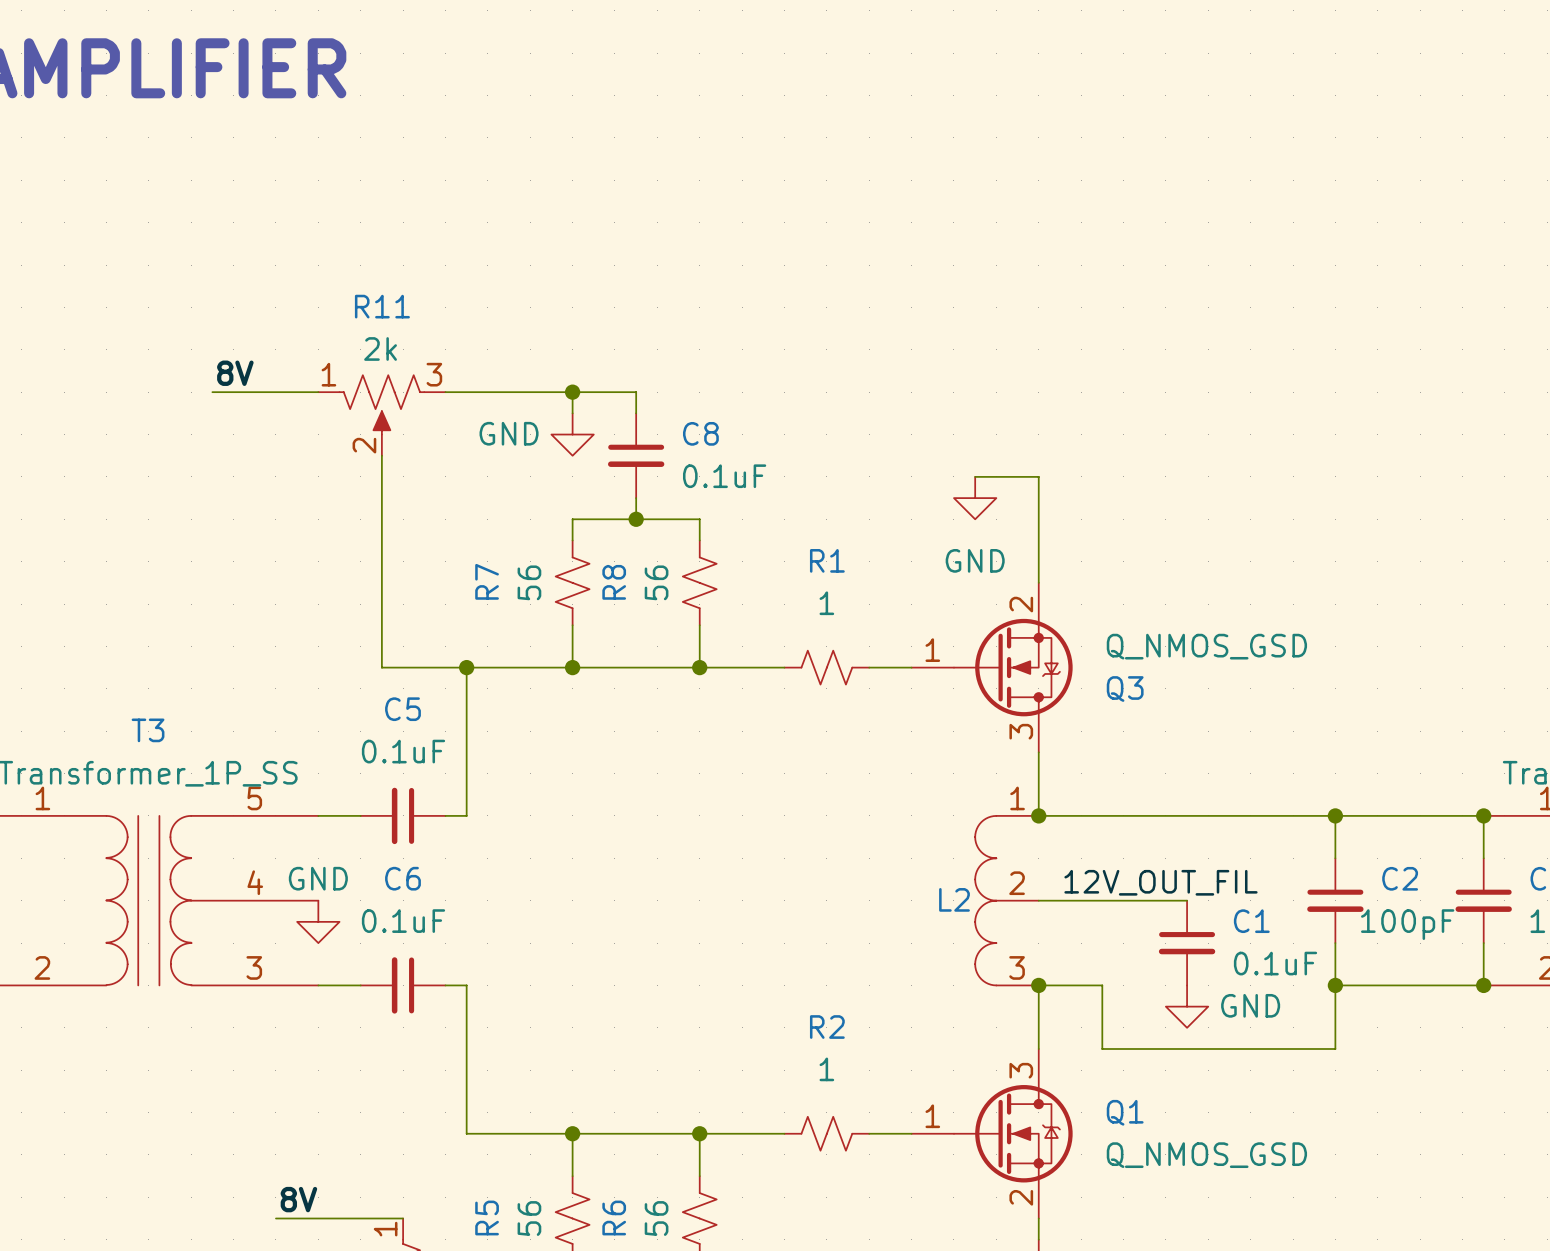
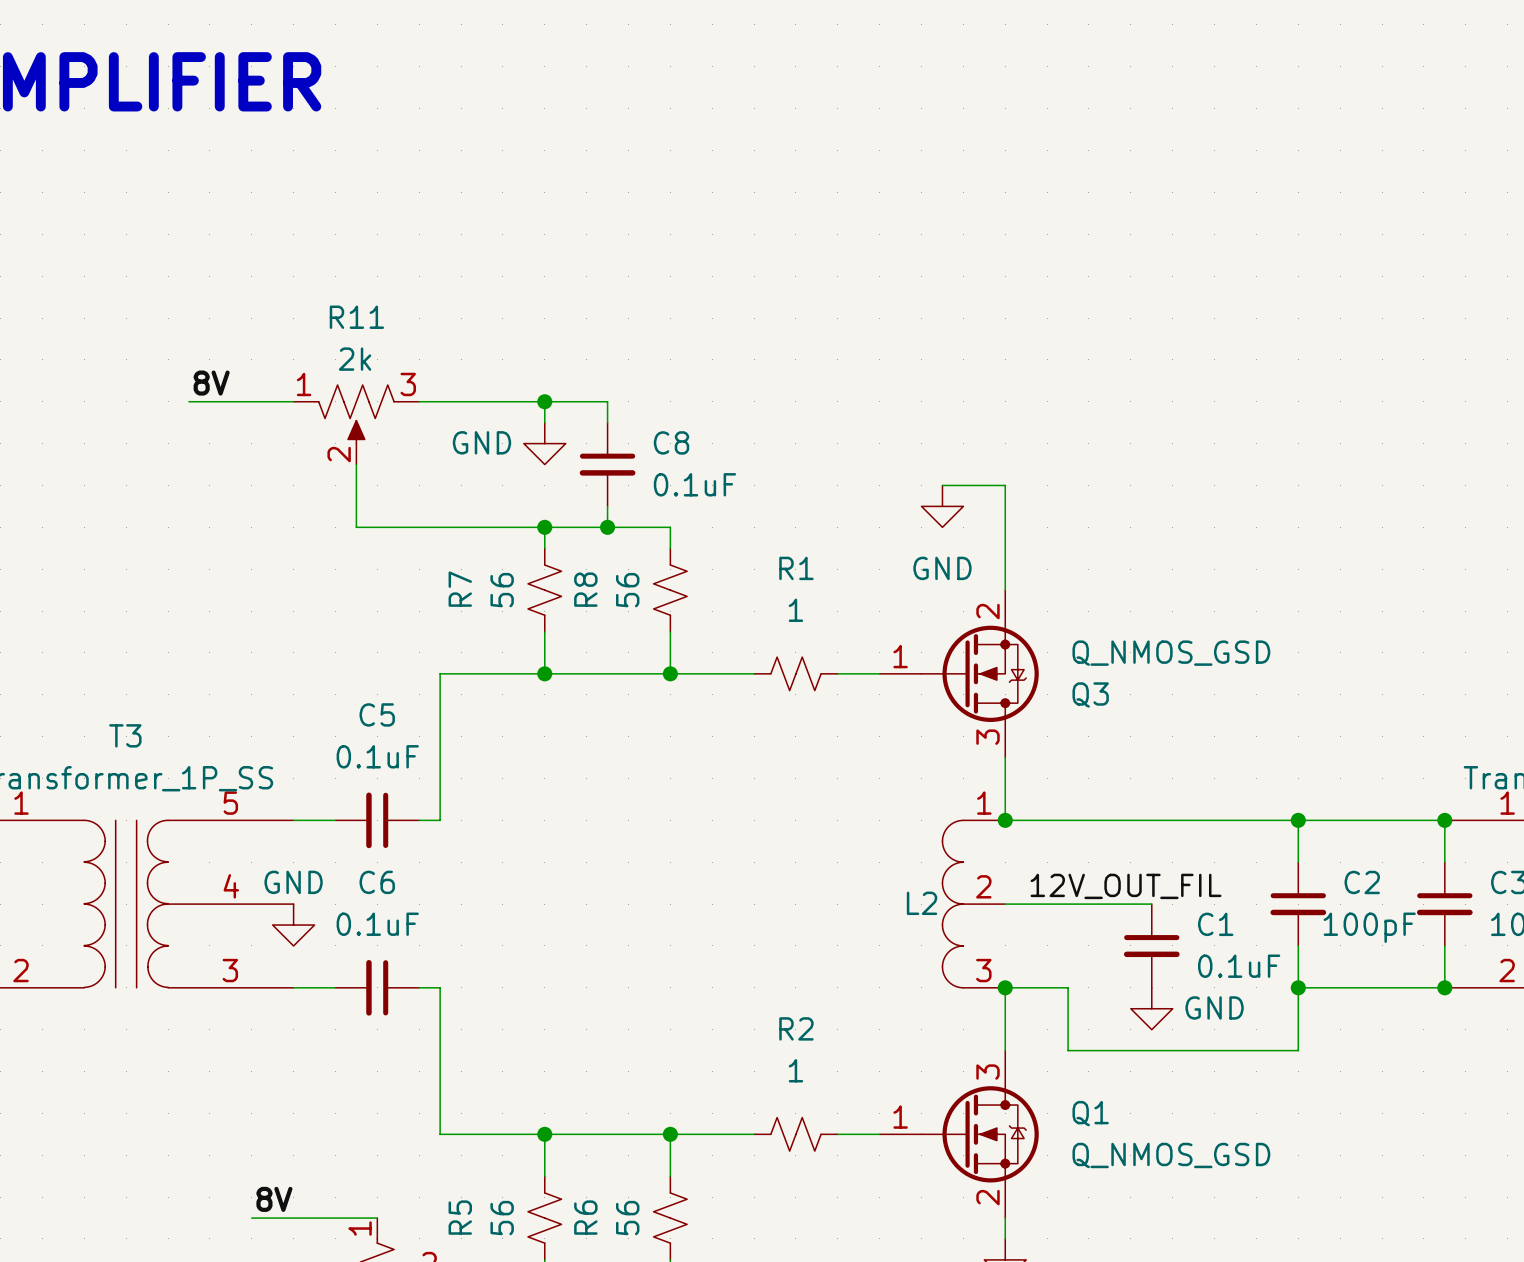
wire: (381, 519) (381, 667) (466, 667) -> (356, 527) (544, 527)
junction: none -> (544, 527)
junction: (466, 667) -> none

